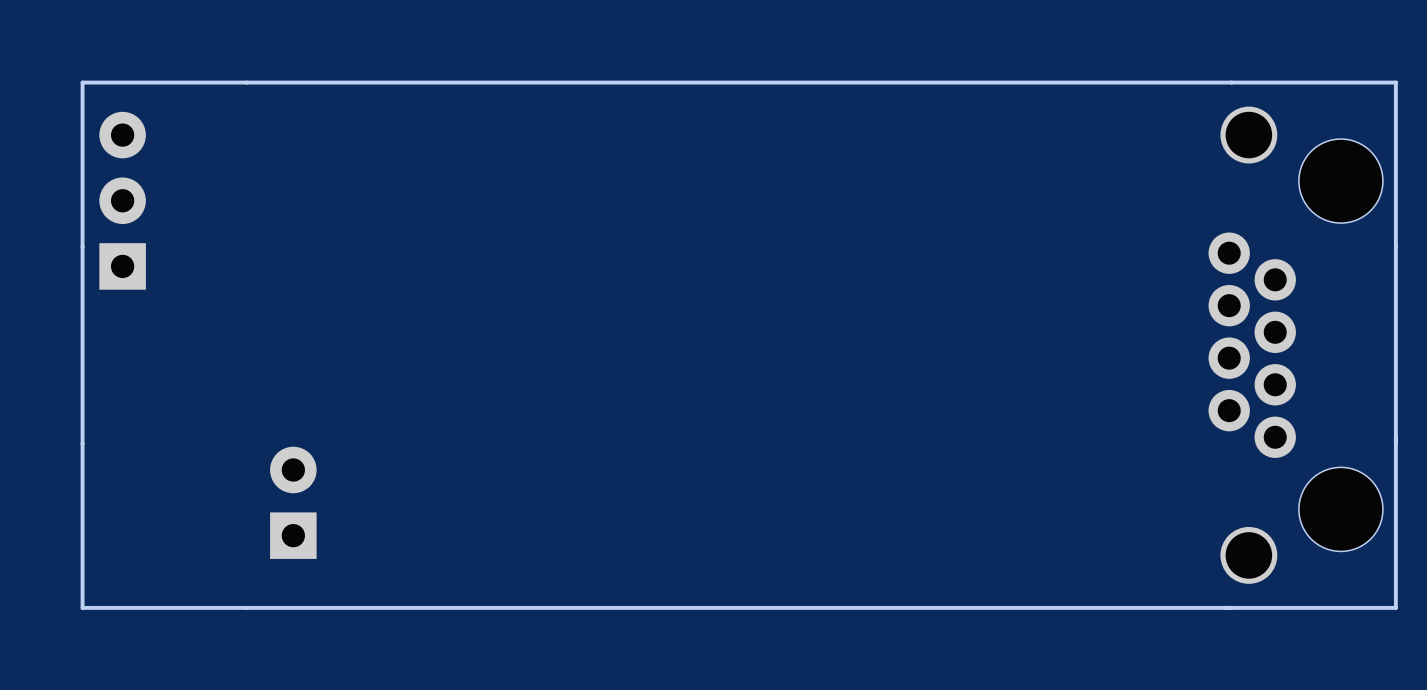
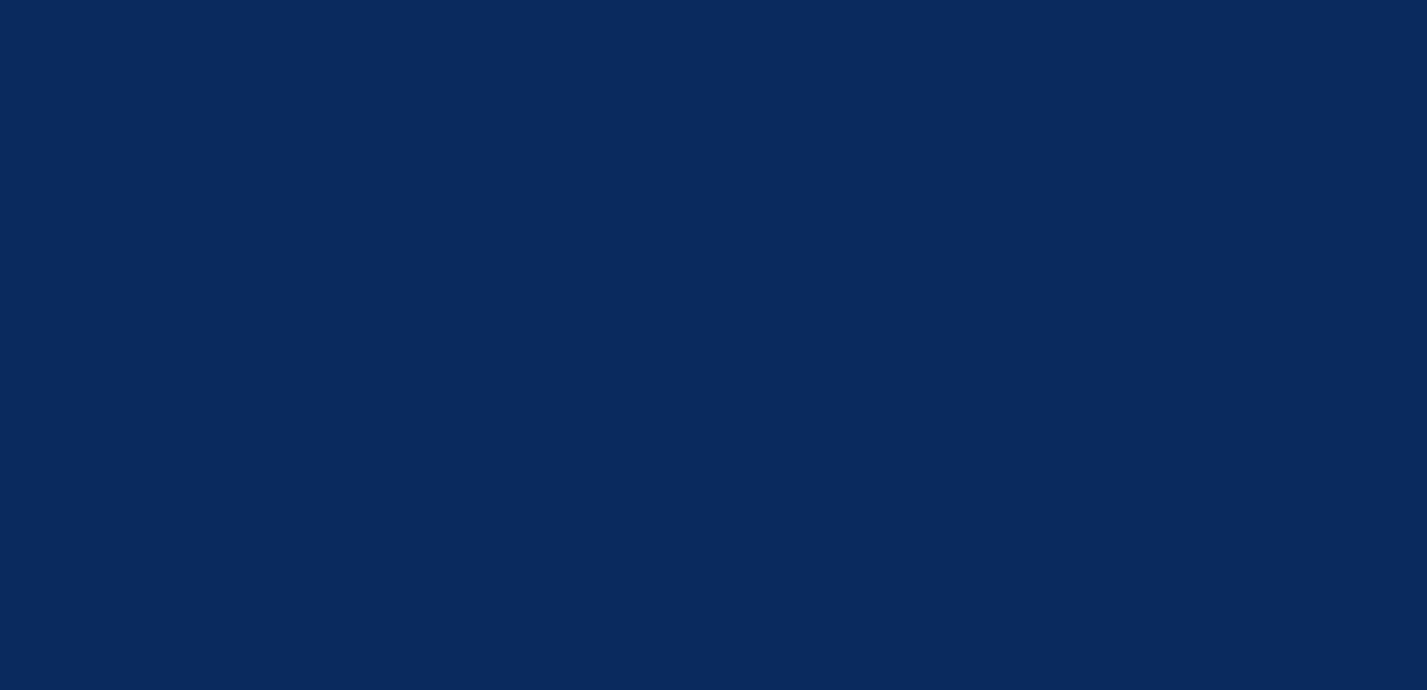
board edge: (1395, 82) (82, 82) (82, 607) (1395, 607) (1395, 82) -> none
part: (122, 200) -> none
part: (1295, 345) -> none
part: (293, 502) -> none

